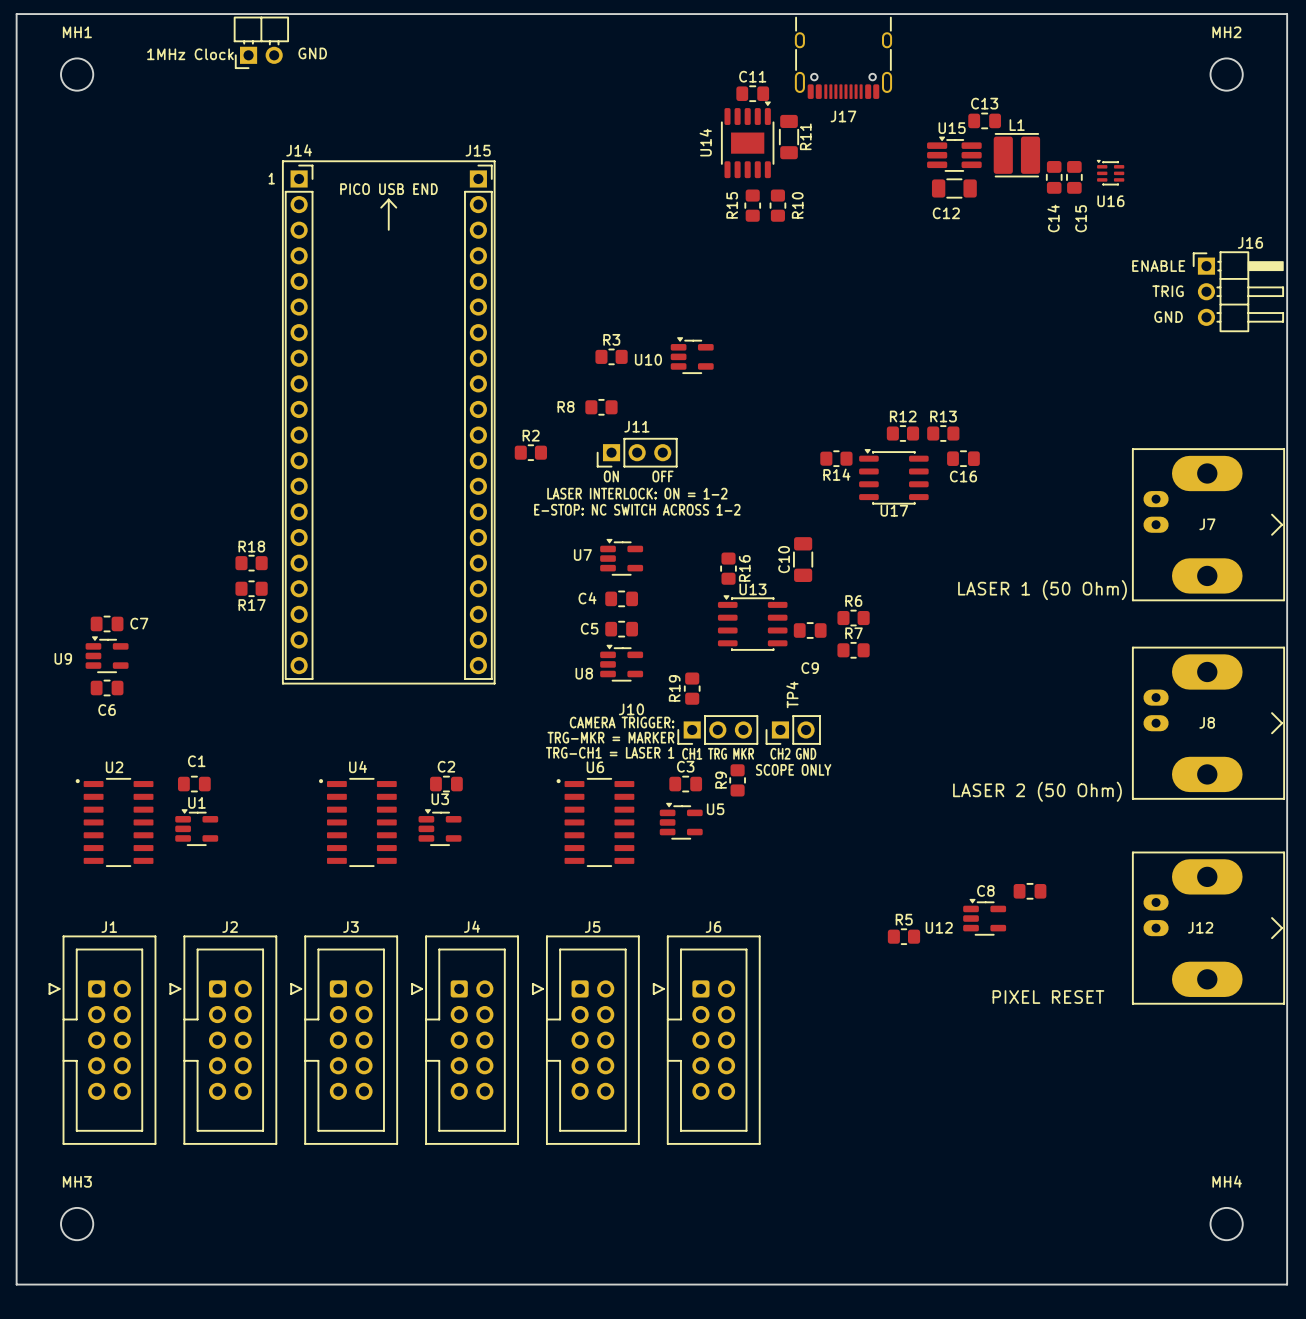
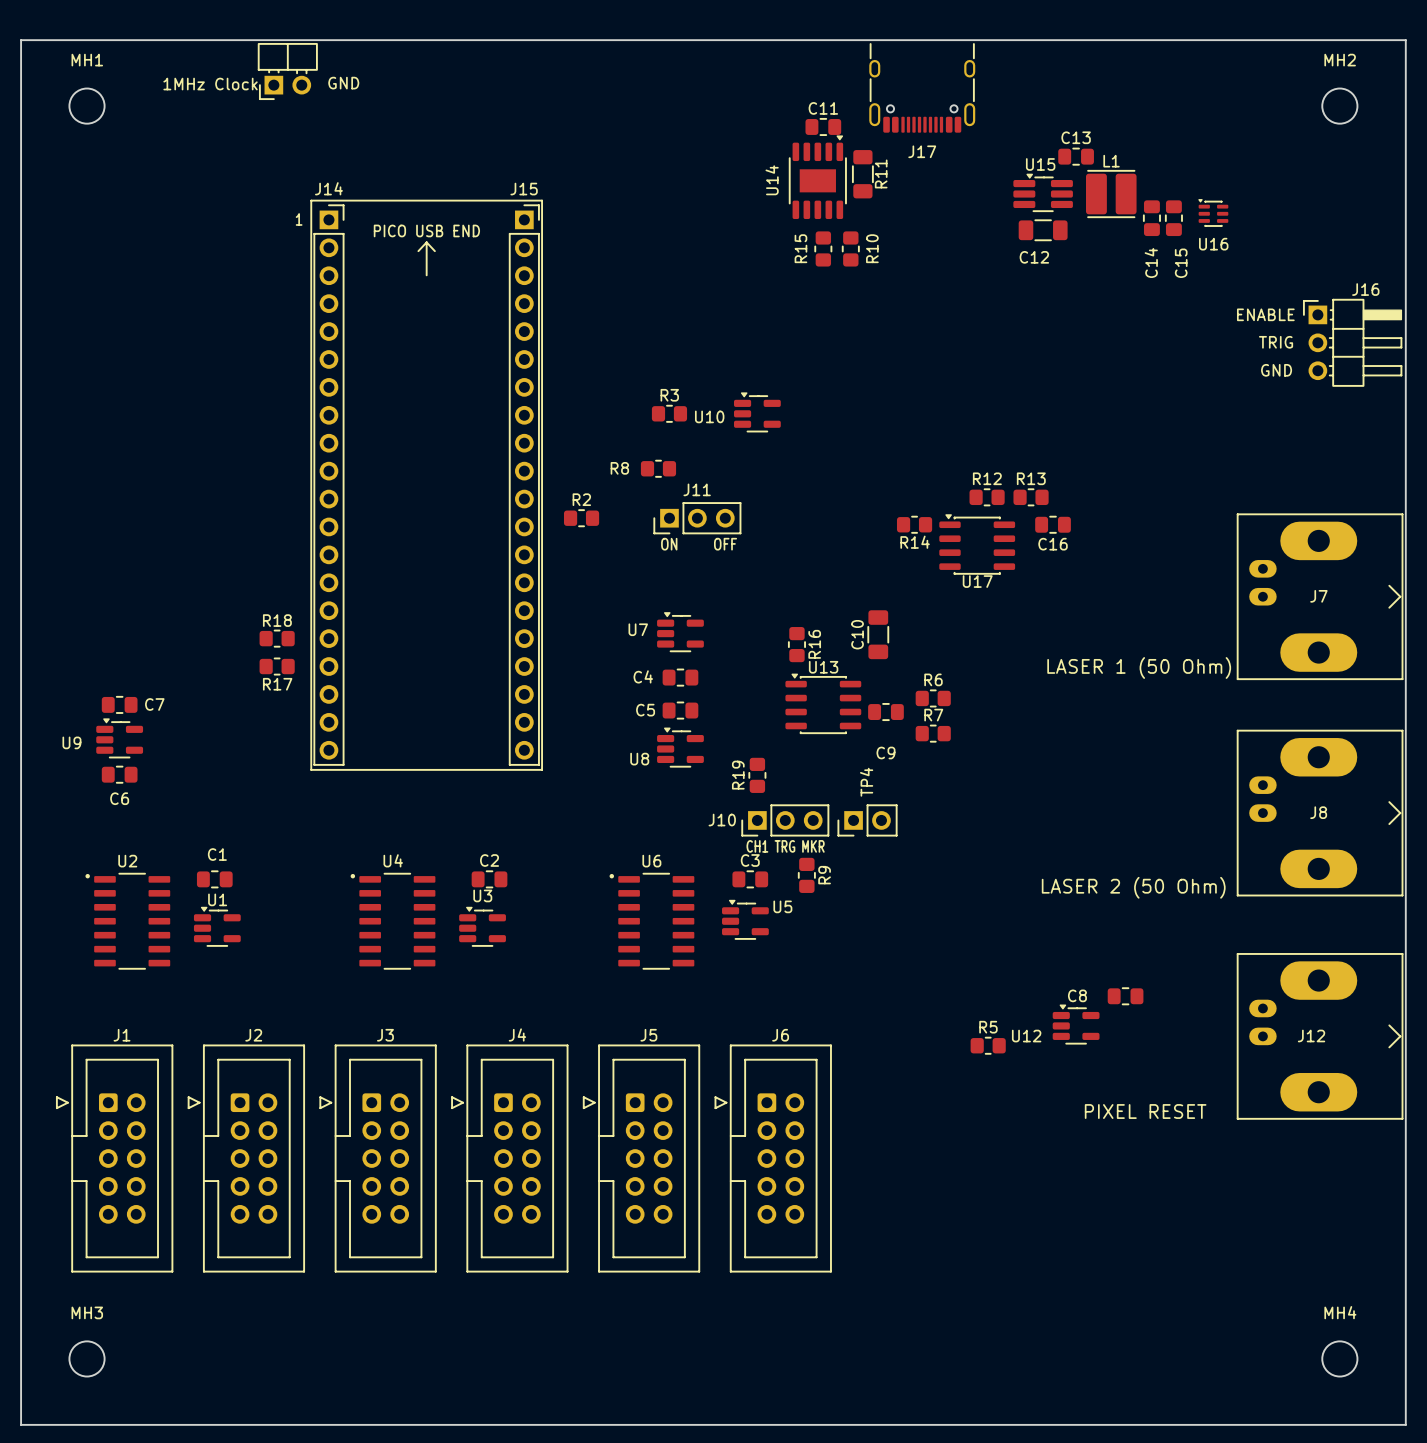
text: LASER INTERLOCK: ON = 1-2 (637, 493) -> none
text: E-STOP: NC SWITCH ACROSS 1-2 (637, 509) -> none
J10 name position: J10 (631, 709) -> J10 (722, 820)
text: CAMERA TRIGGER: (622, 722) -> none
text: TRG-MKR = MARKER (610, 737) -> none
text: TRG-CH1 = LASER 1 (610, 752) -> none
text: CH2 (780, 753) -> none
text: GND (806, 753) -> none
text: SCOPE ONLY (793, 769) -> none
R9 name position: R9 (721, 780) -> R9 (824, 875)

